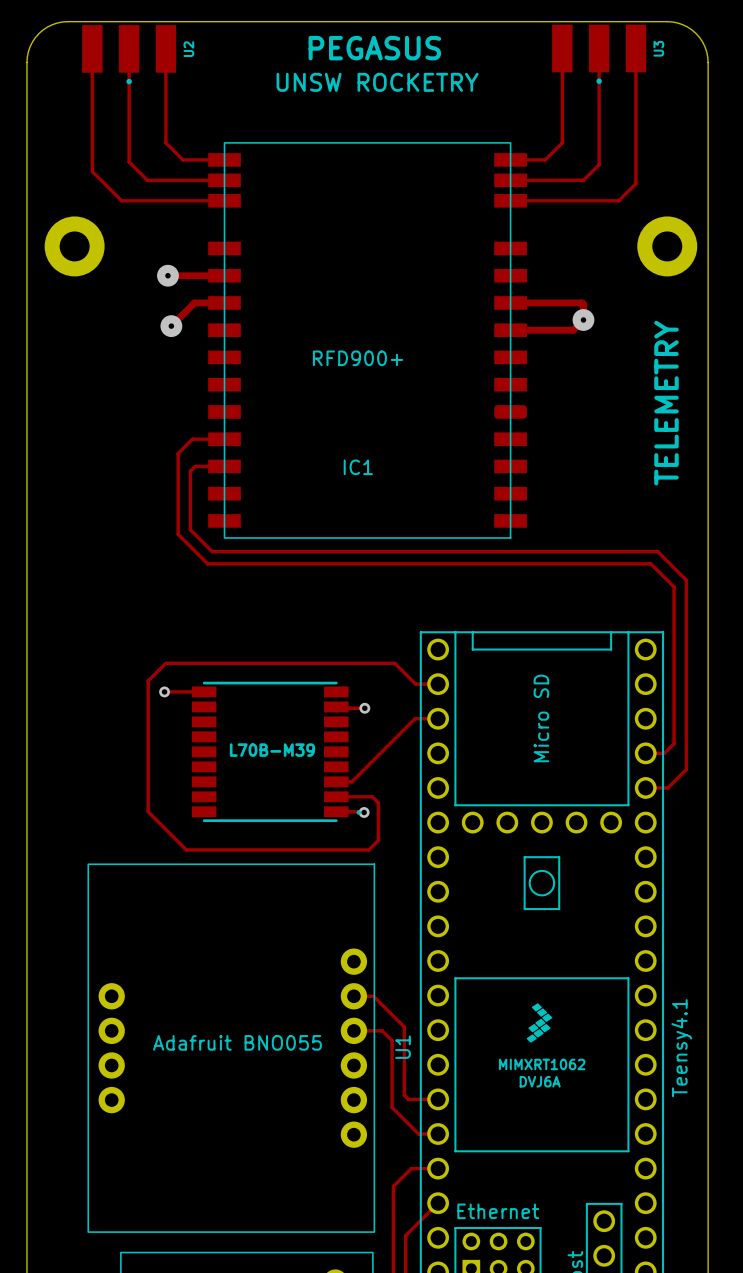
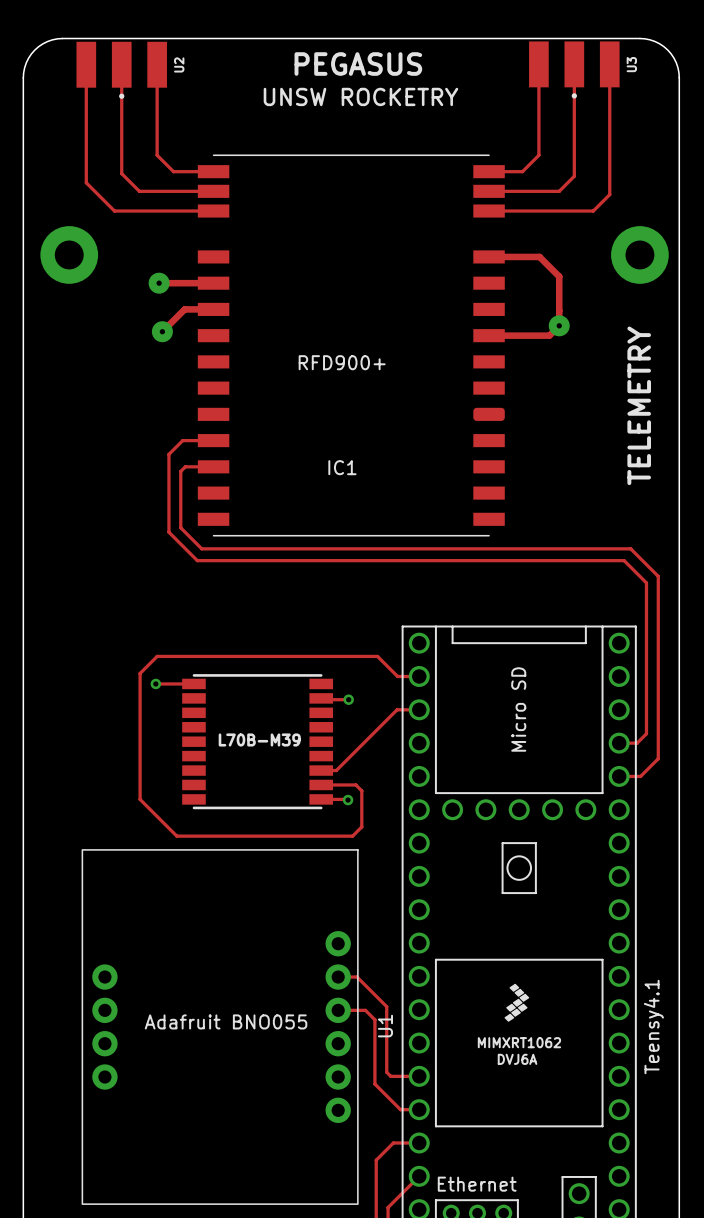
IC1 footprint: [208, 142, 527, 539] -> [197, 154, 505, 537]
track: (510, 302) (583, 304) -> (489, 256) (539, 256) (559, 276) (559, 310)
part footprint: [191, 681, 362, 823] -> [182, 674, 334, 810]

